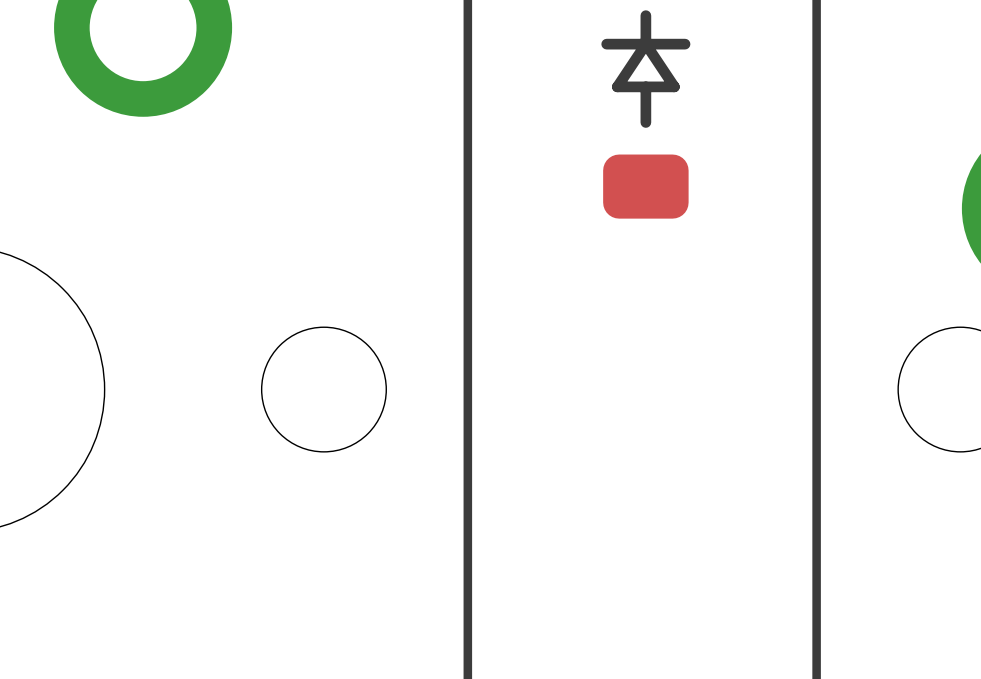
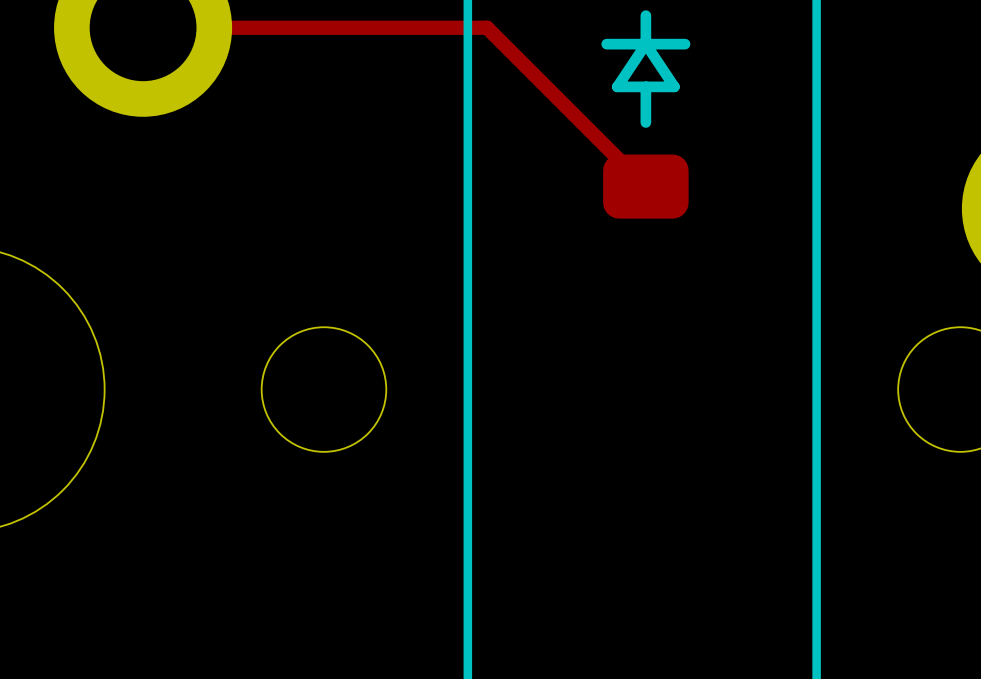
track: none -> (143, 27) (487, 27) (645, 186)

